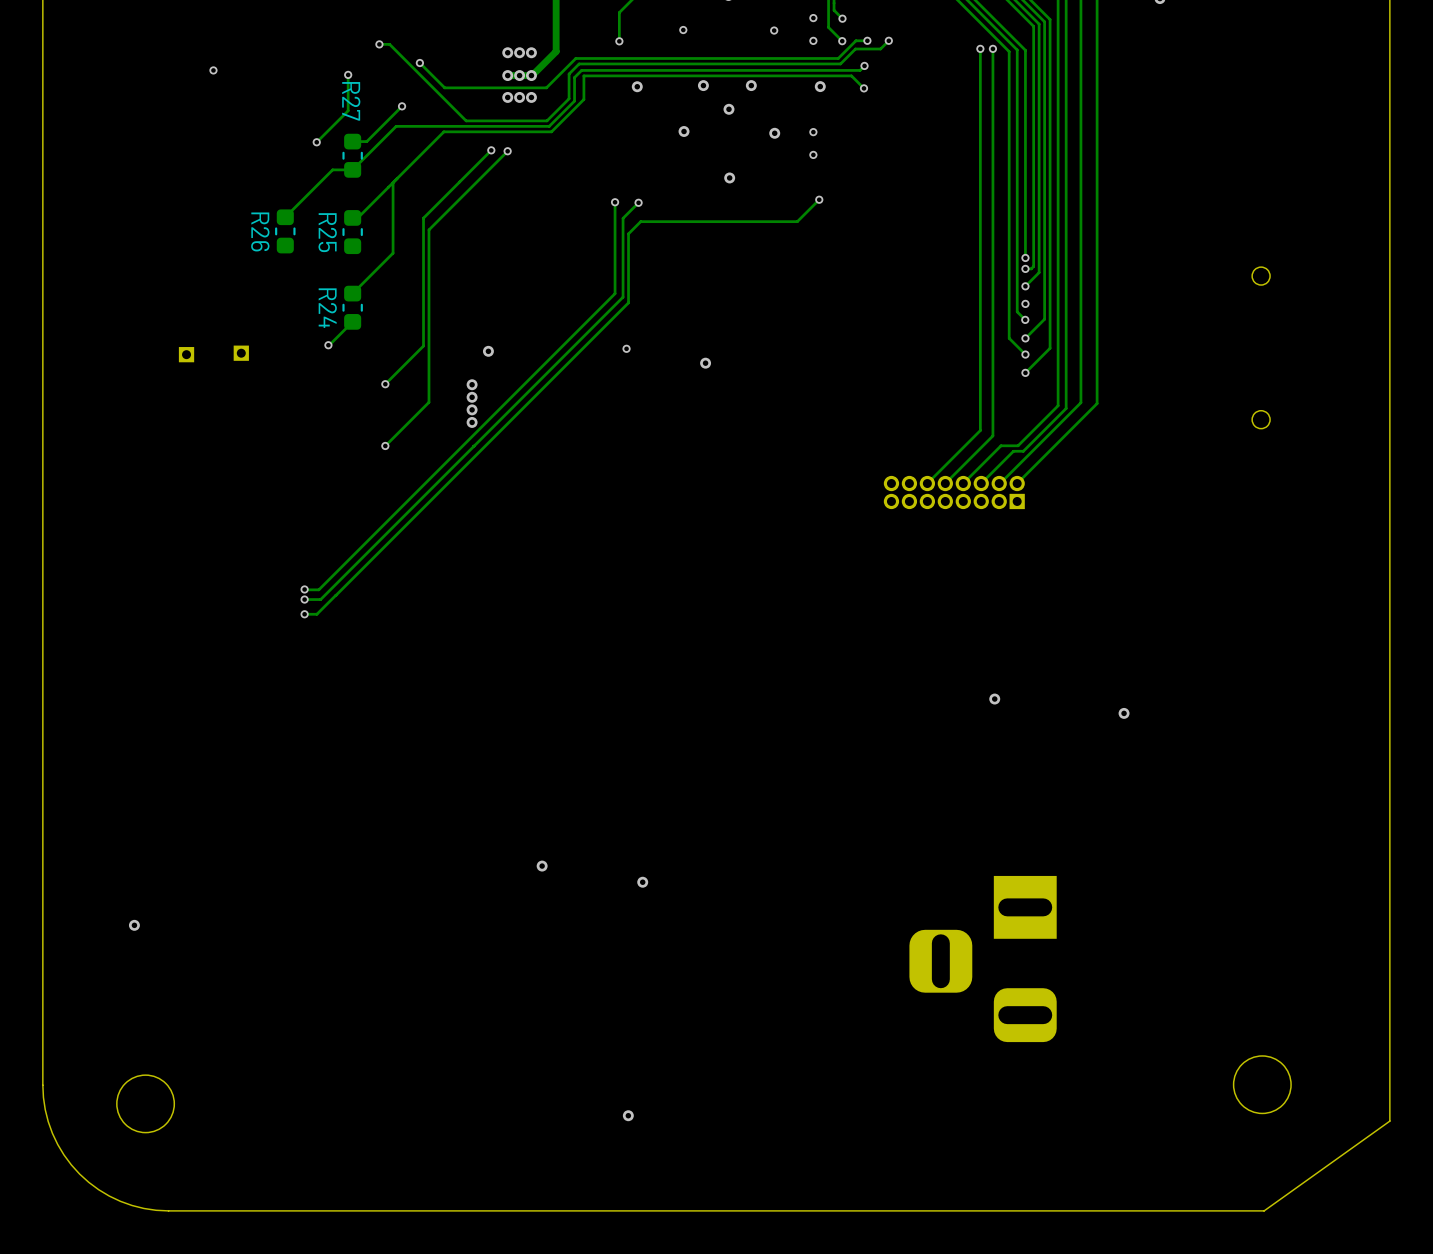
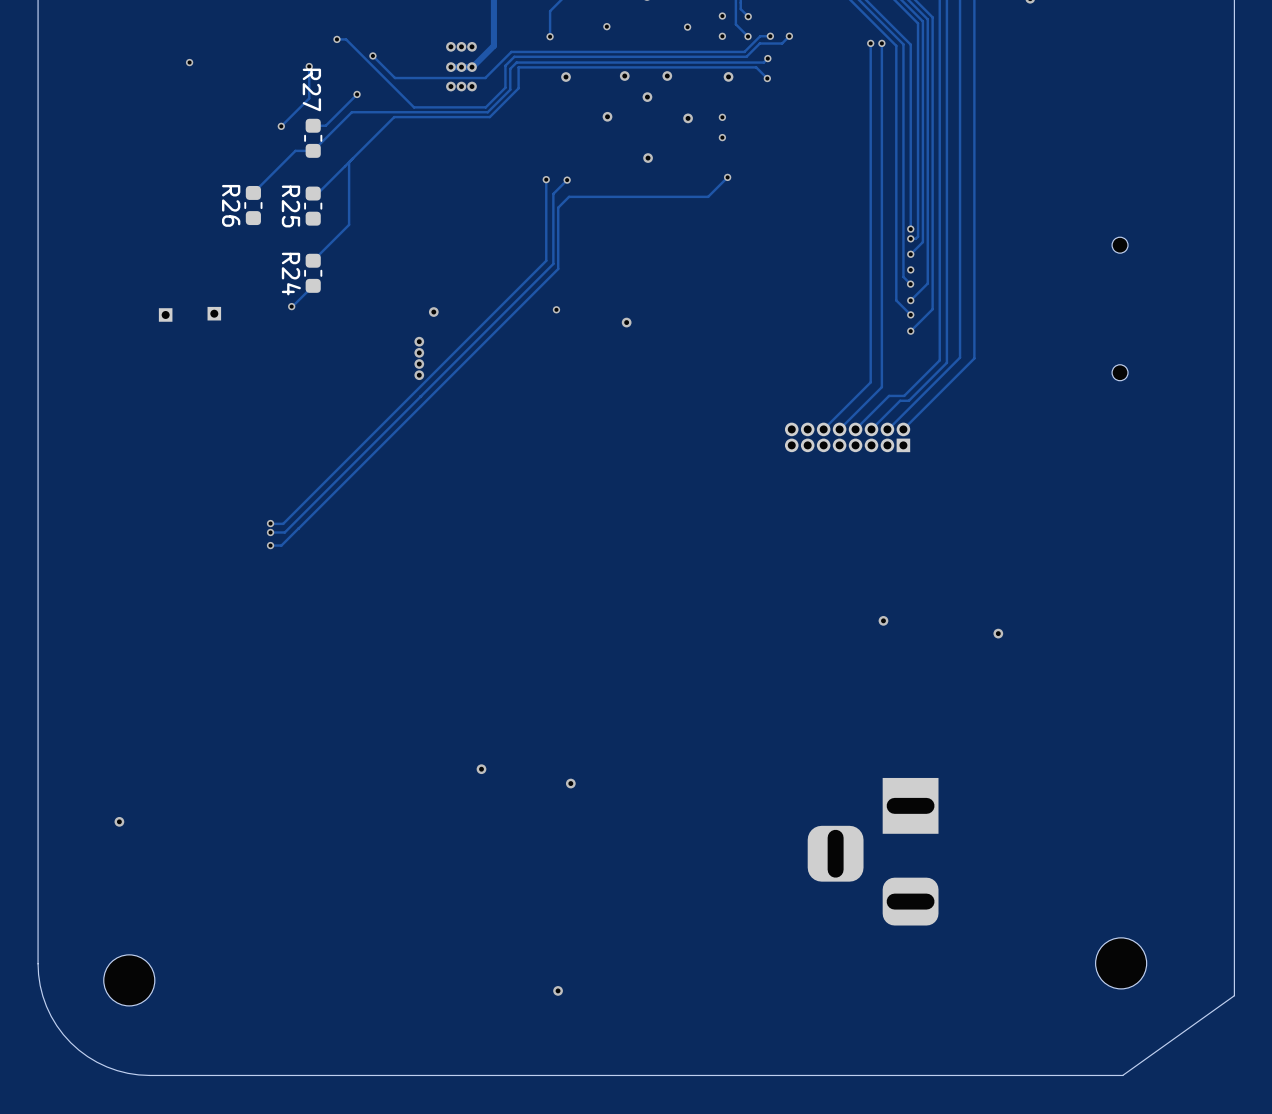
track: (491, 150) (423, 218) (423, 346) (385, 384) -> none
via: (491, 150) -> none
track: (507, 151) (428, 229) (428, 402) (385, 445) -> none
via: (507, 151) -> none
via: (385, 384) -> none
via: (385, 445) -> none

